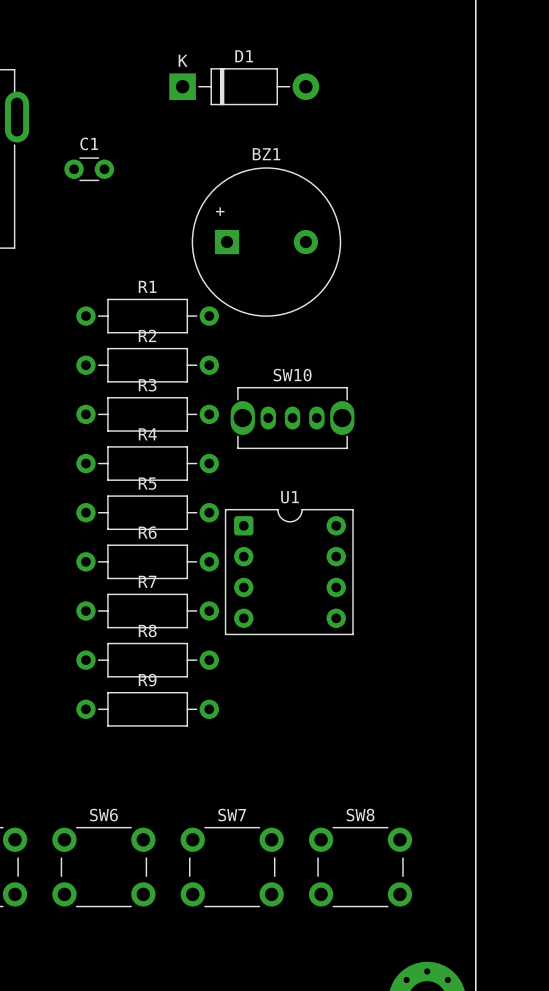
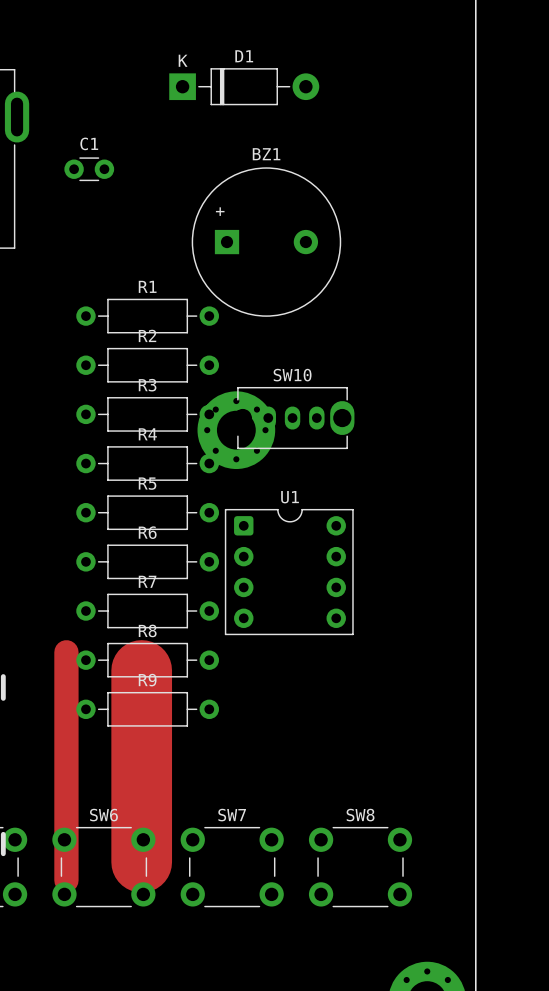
part: none -> (236, 430)
top track: none -> (66, 652) (66, 880)
top track: none -> (141, 670) (141, 862)
line: none -> (3, 676) (3, 698)
line: none -> (3, 834) (3, 853)

